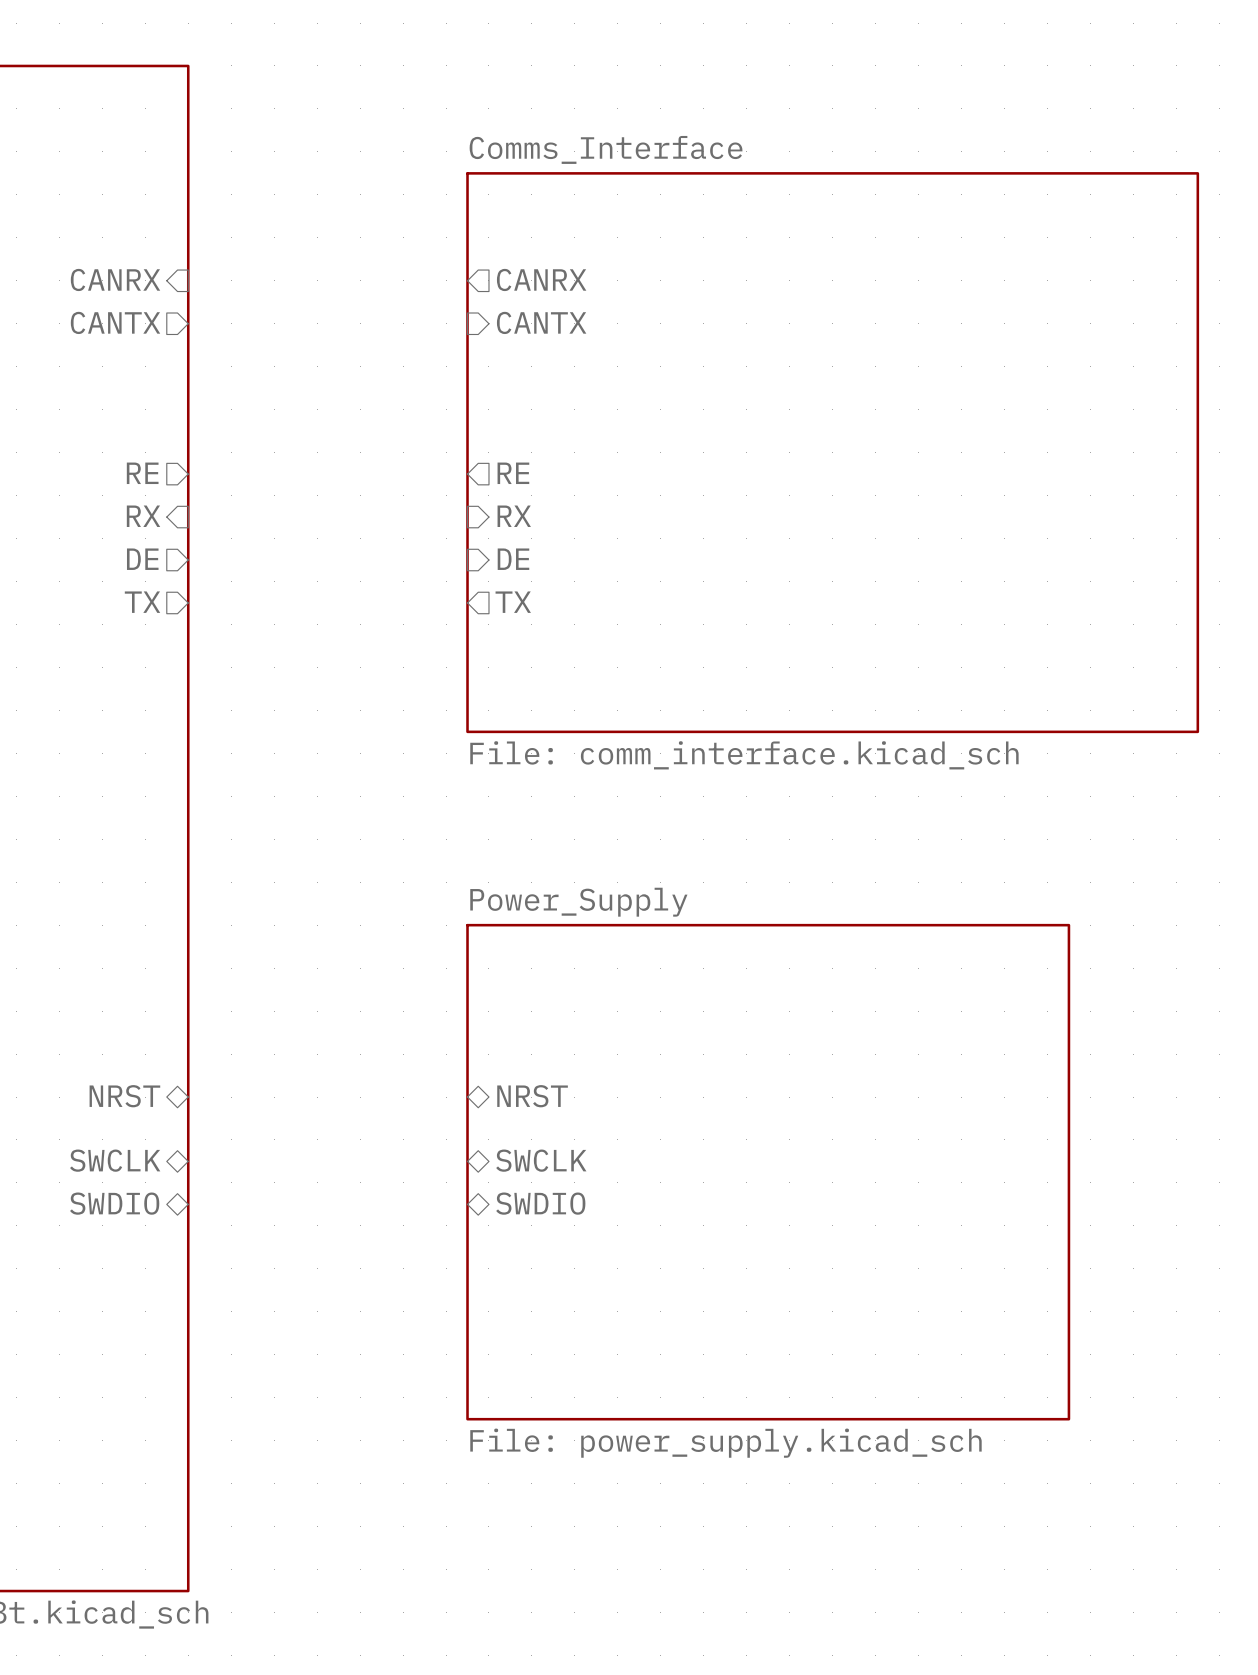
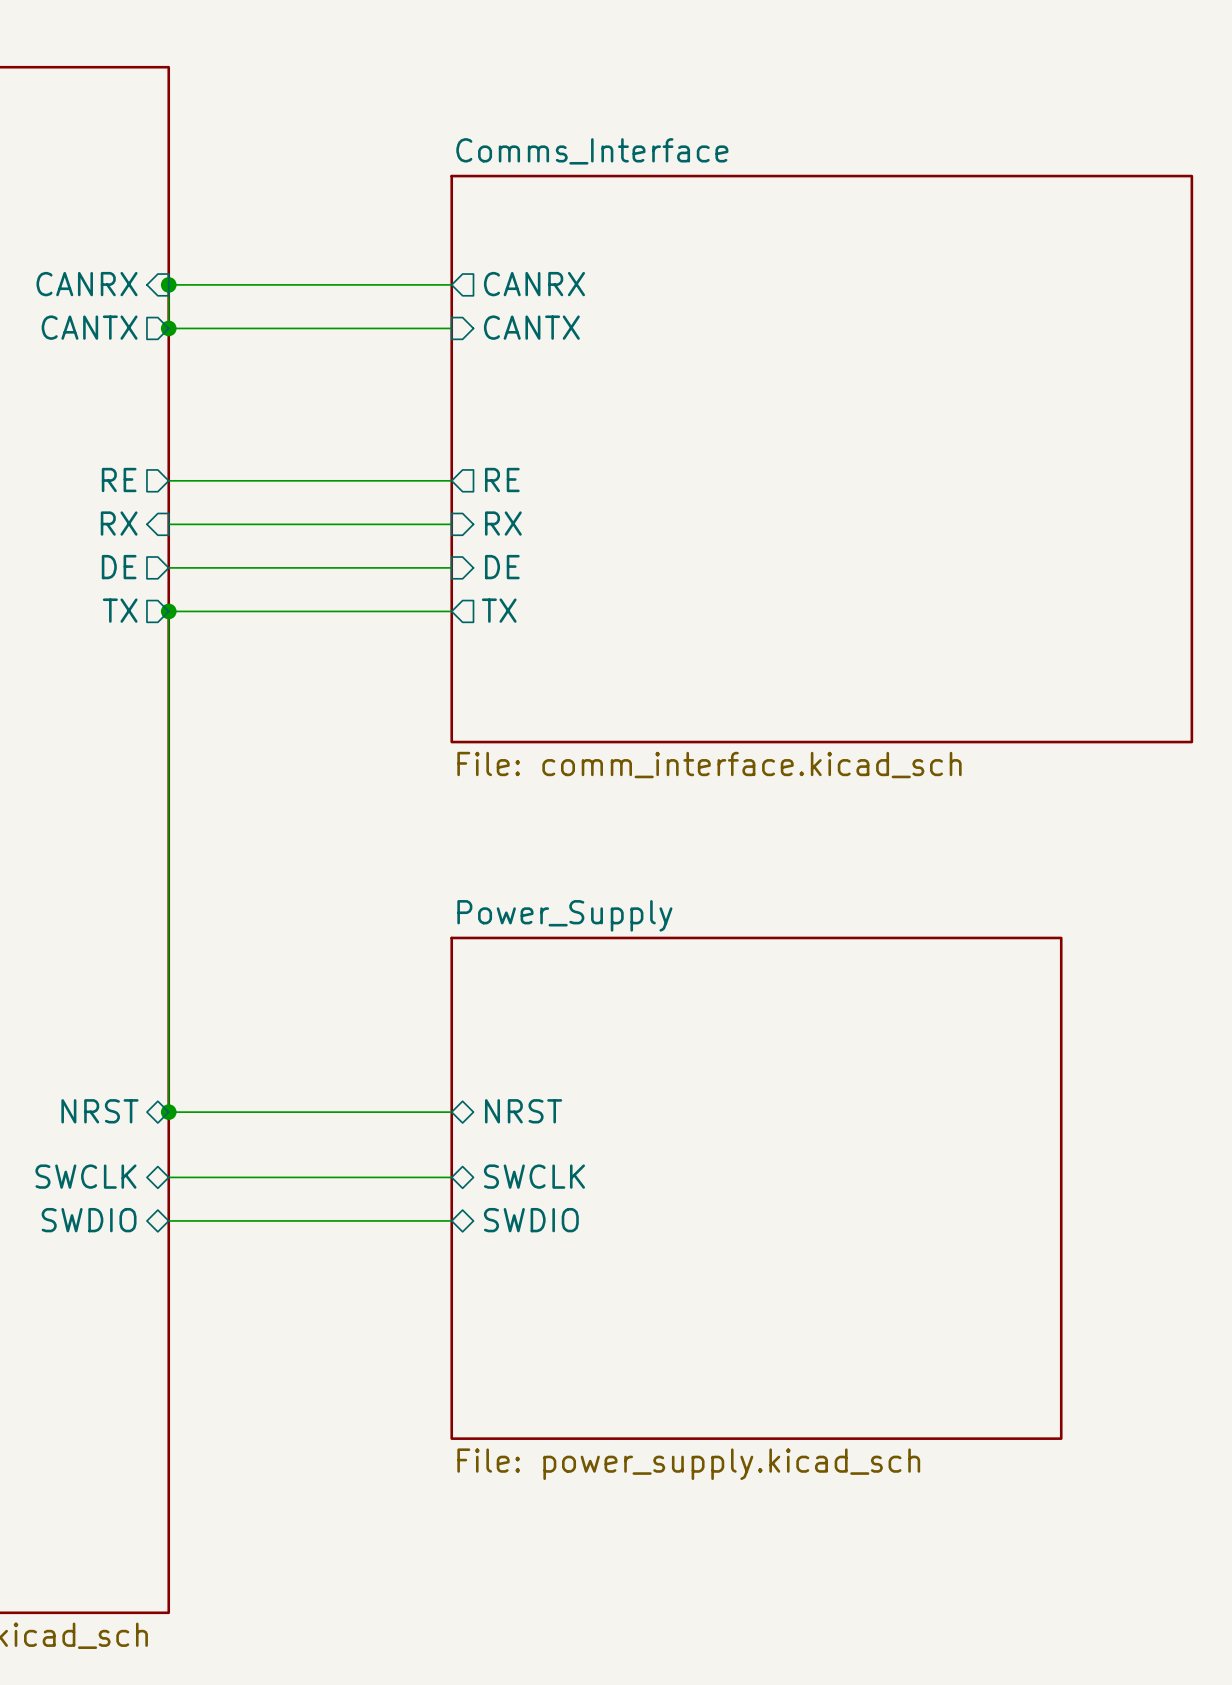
junction: none -> (168, 284)
wire: none -> (451, 284) (168, 284) (168, 328) (451, 328)
junction: none -> (168, 328)
wire: none -> (168, 480) (451, 480)
wire: none -> (168, 524) (451, 524)
wire: none -> (168, 567) (451, 567)
junction: none -> (168, 611)
wire: none -> (451, 611) (168, 611) (168, 1112) (451, 1112)
junction: none -> (168, 1112)
wire: none -> (168, 1177) (451, 1177)
wire: none -> (168, 1220) (451, 1220)

